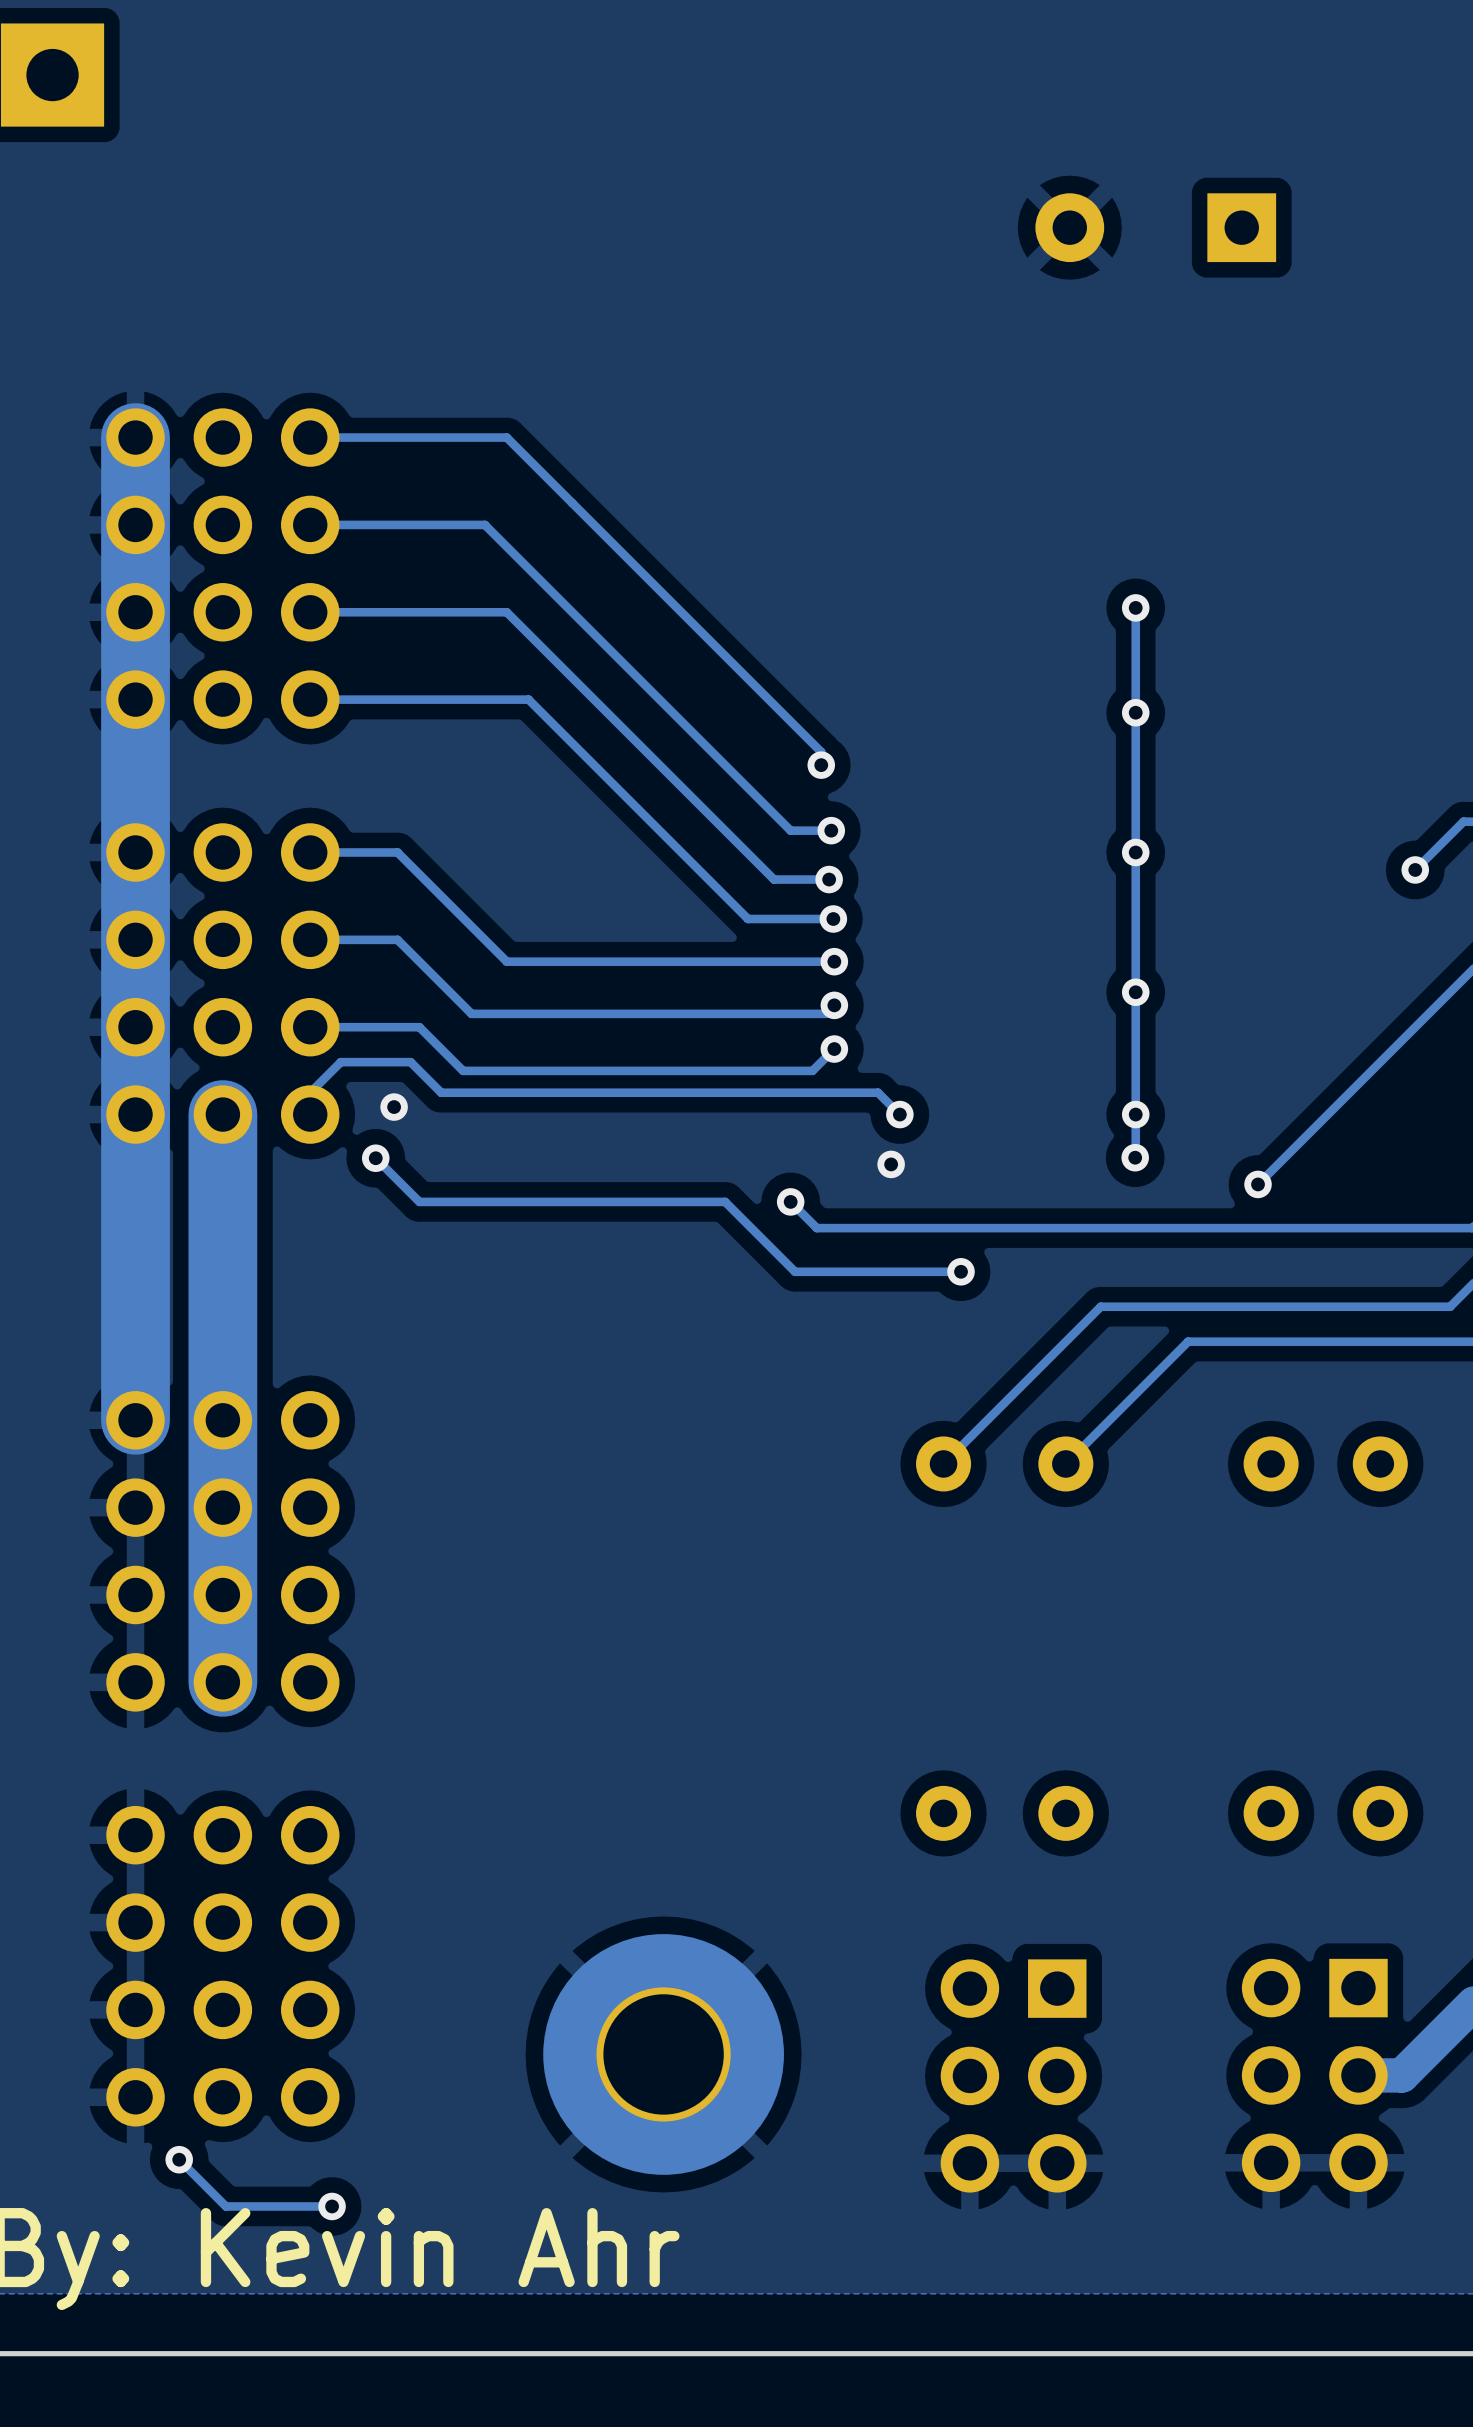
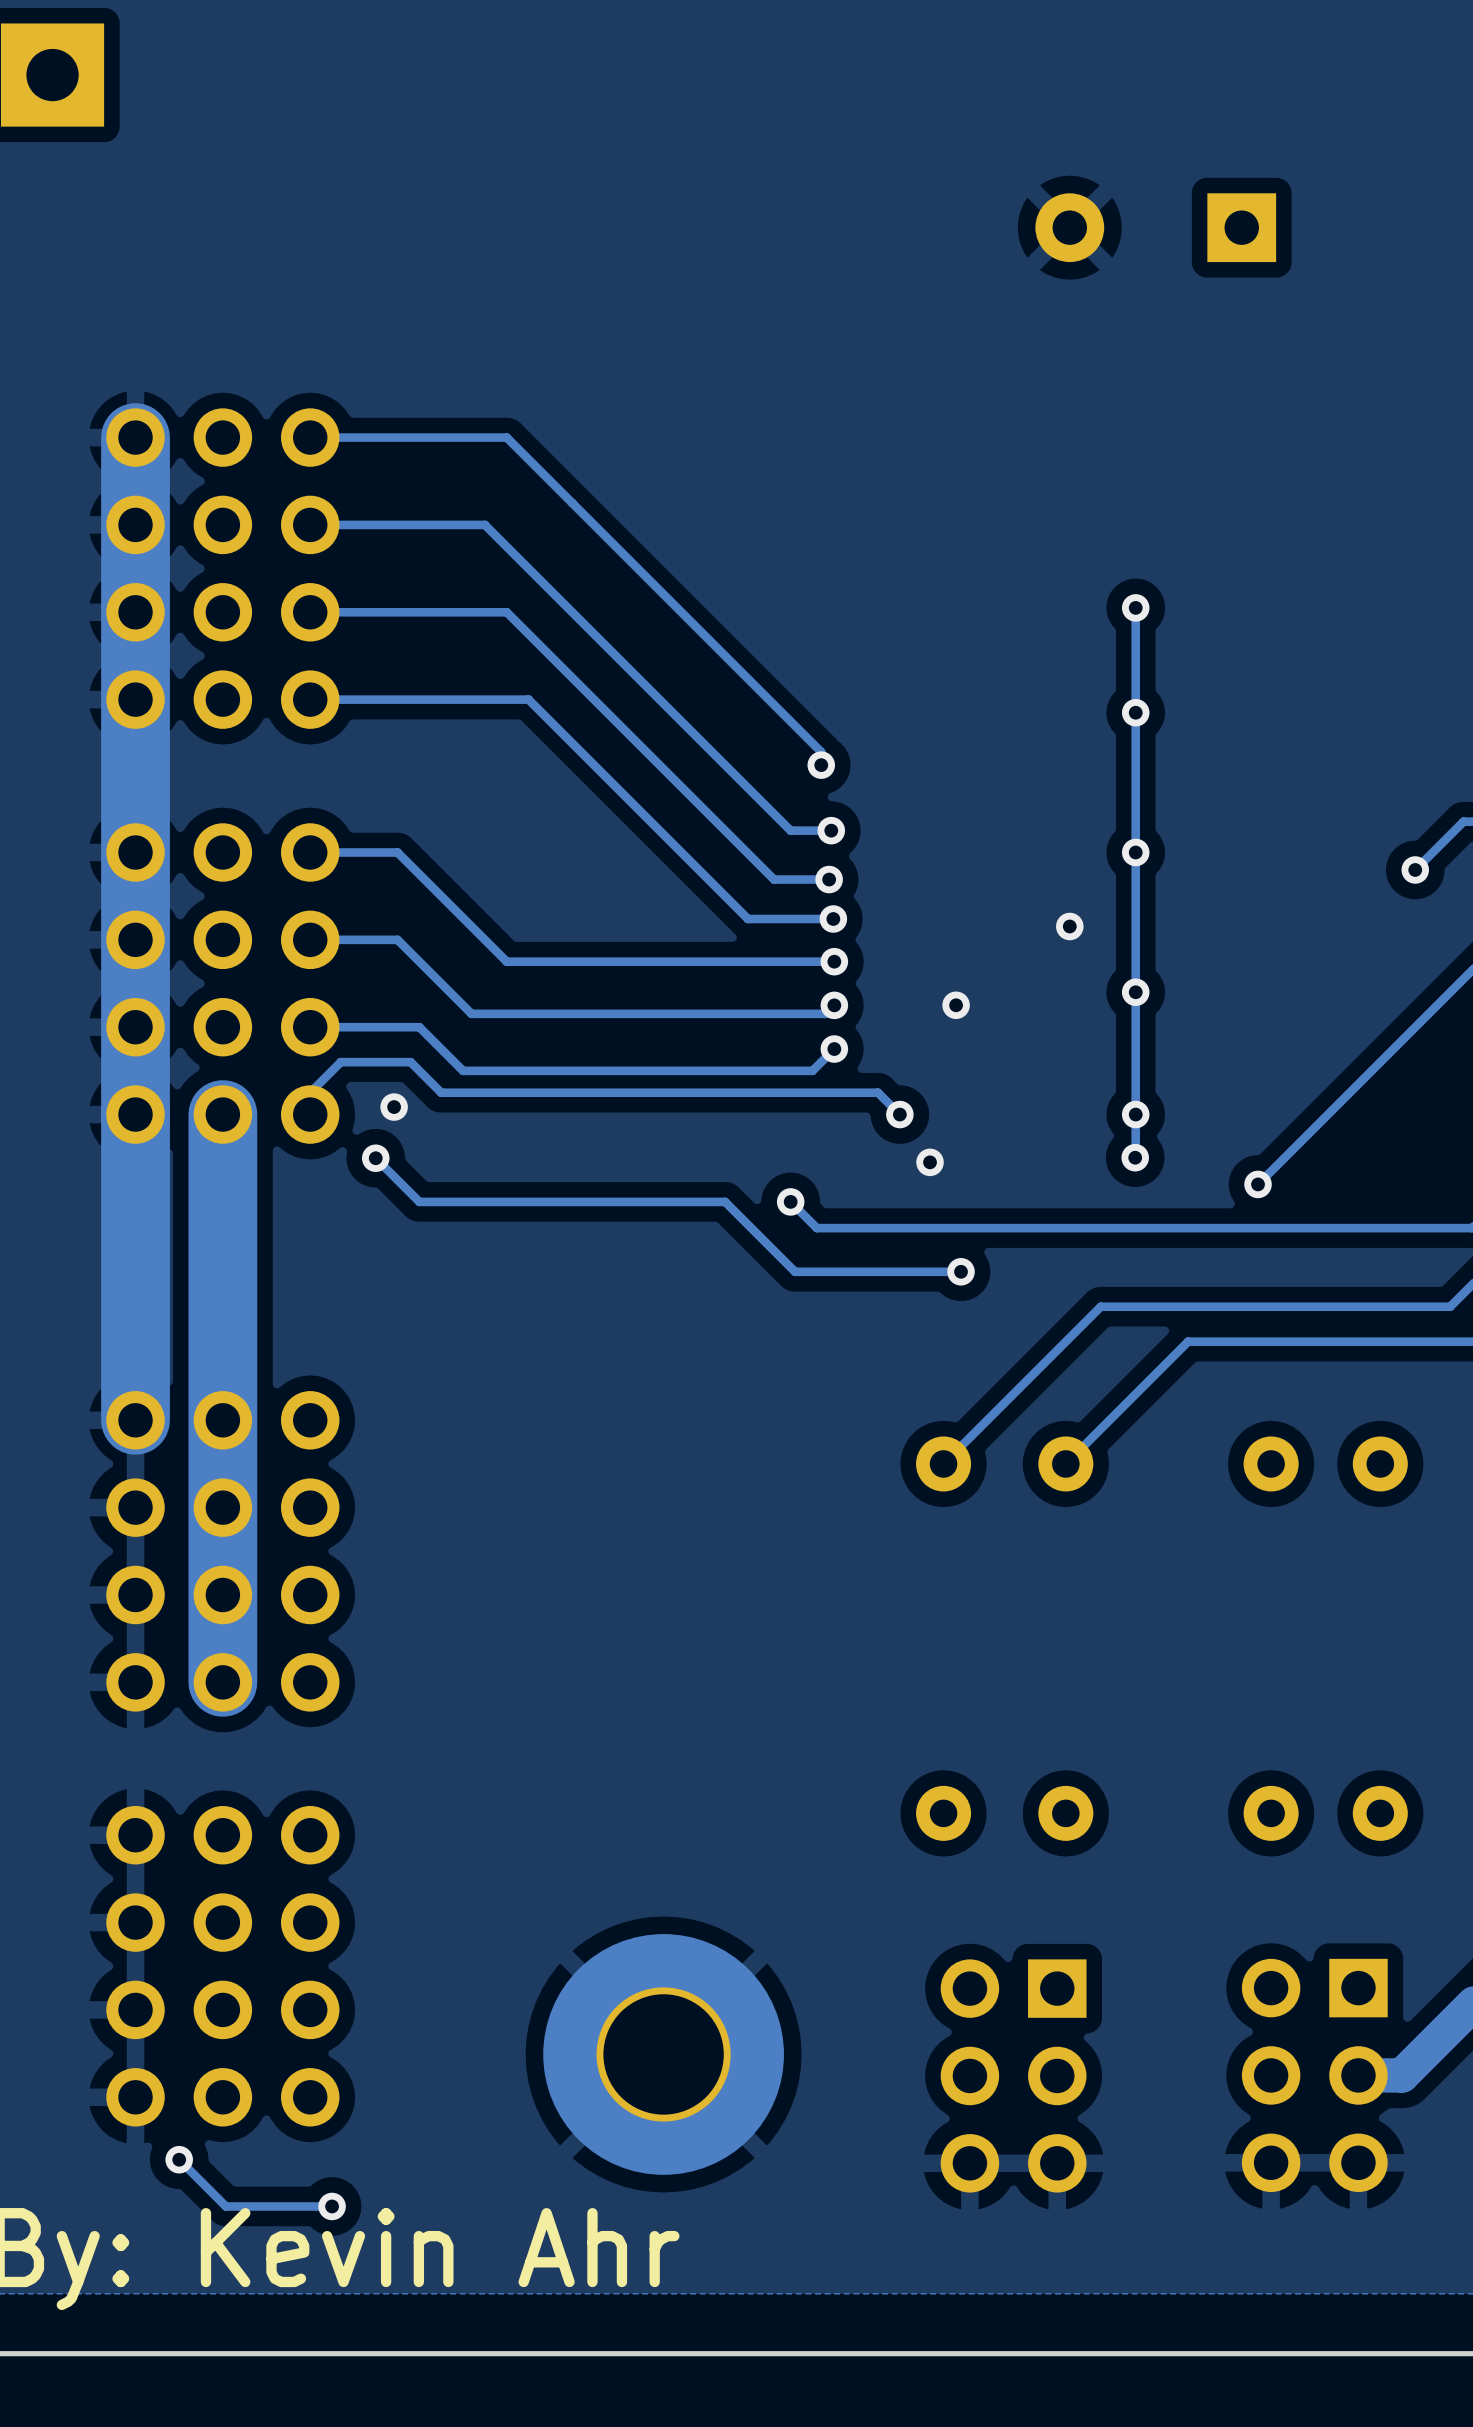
via: none -> (1069, 926)
via: none -> (956, 1005)
via position: (891, 1164) -> (930, 1162)

